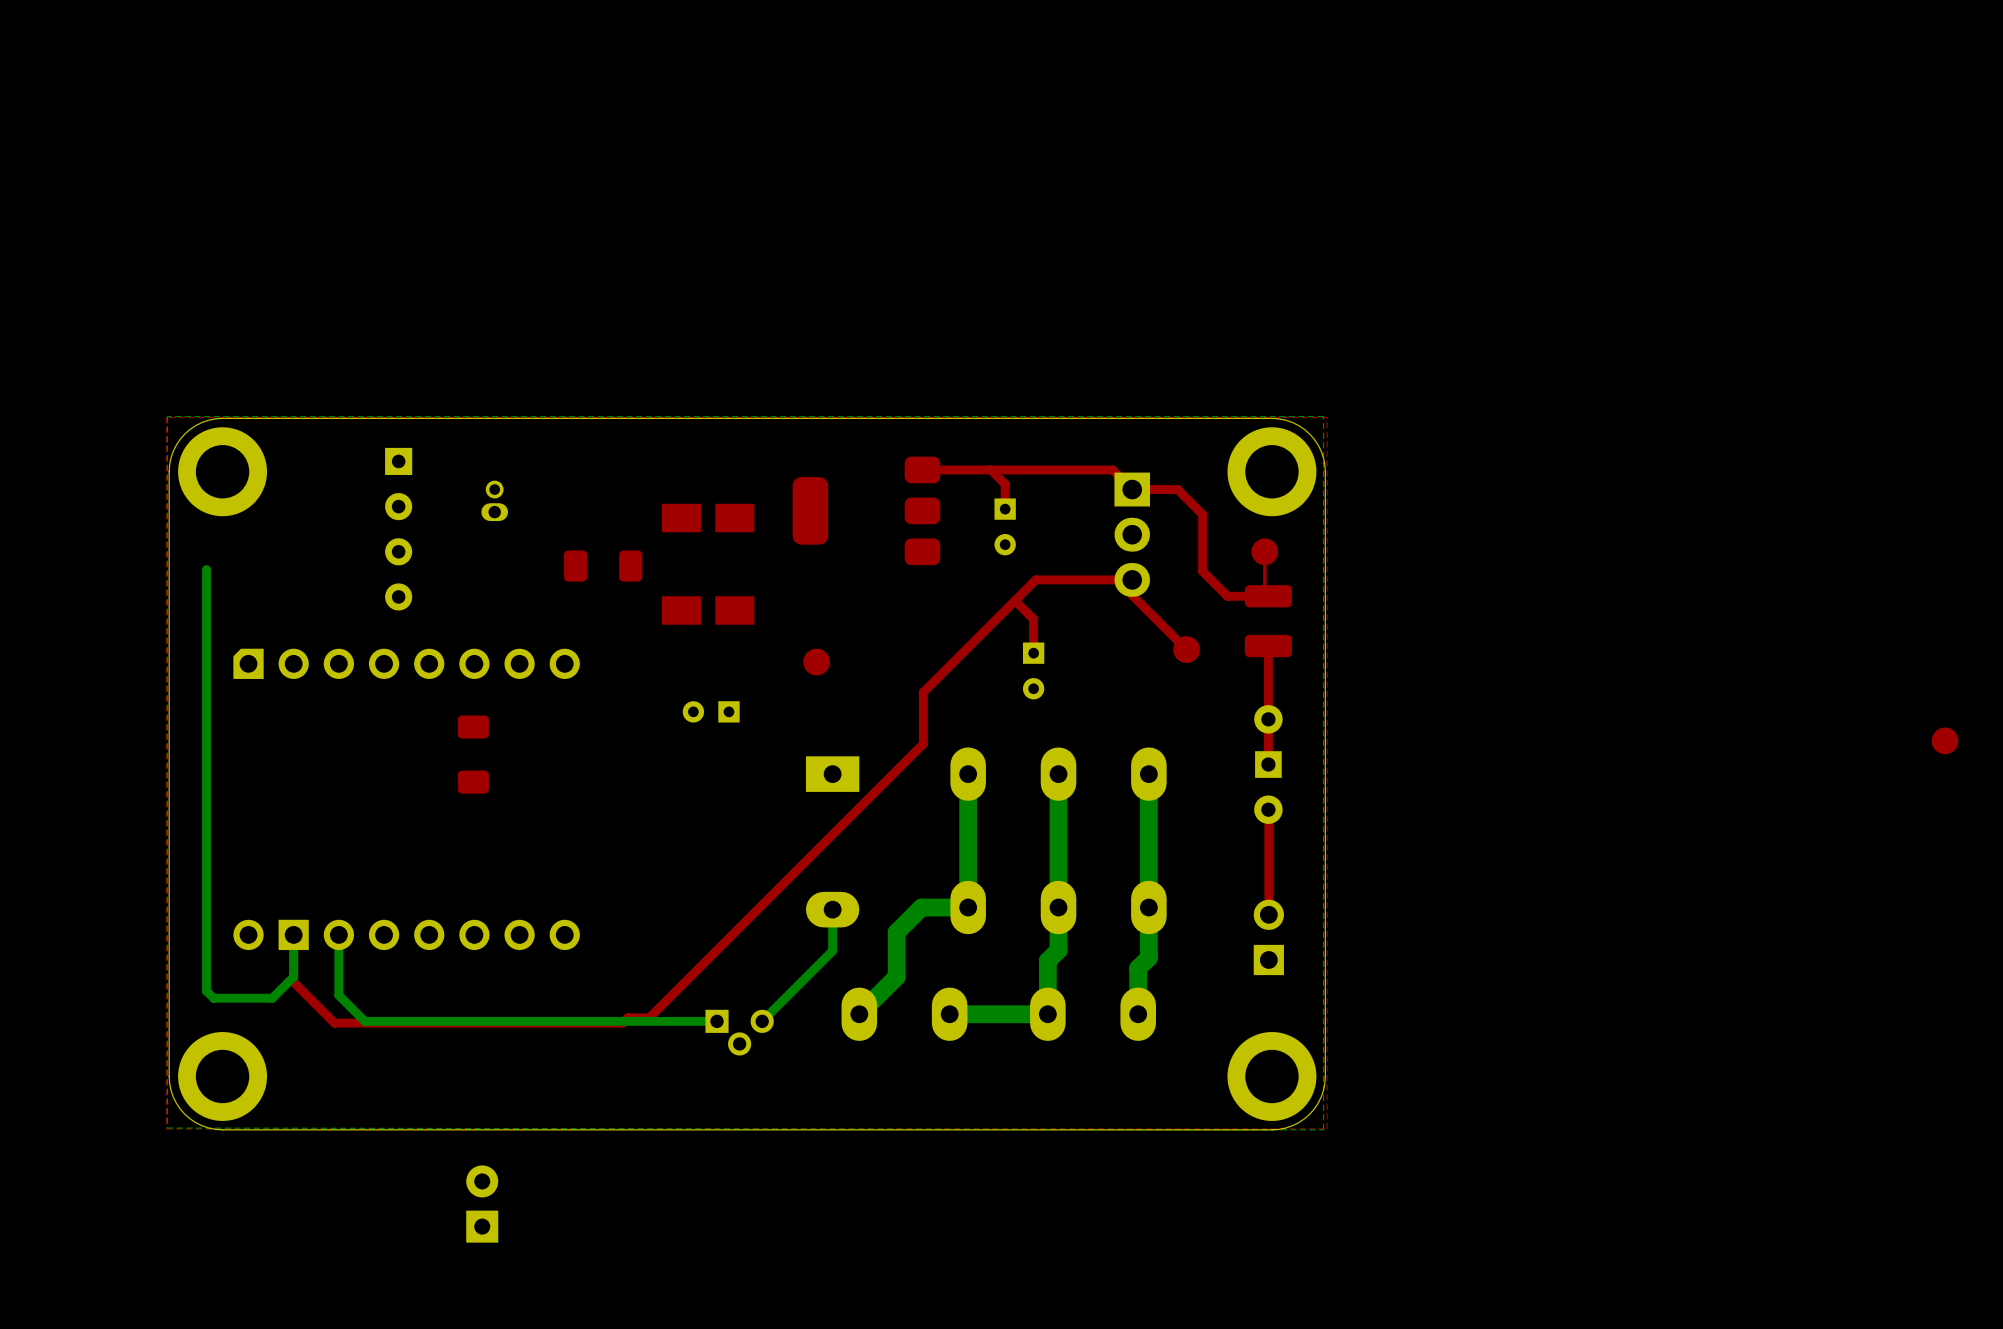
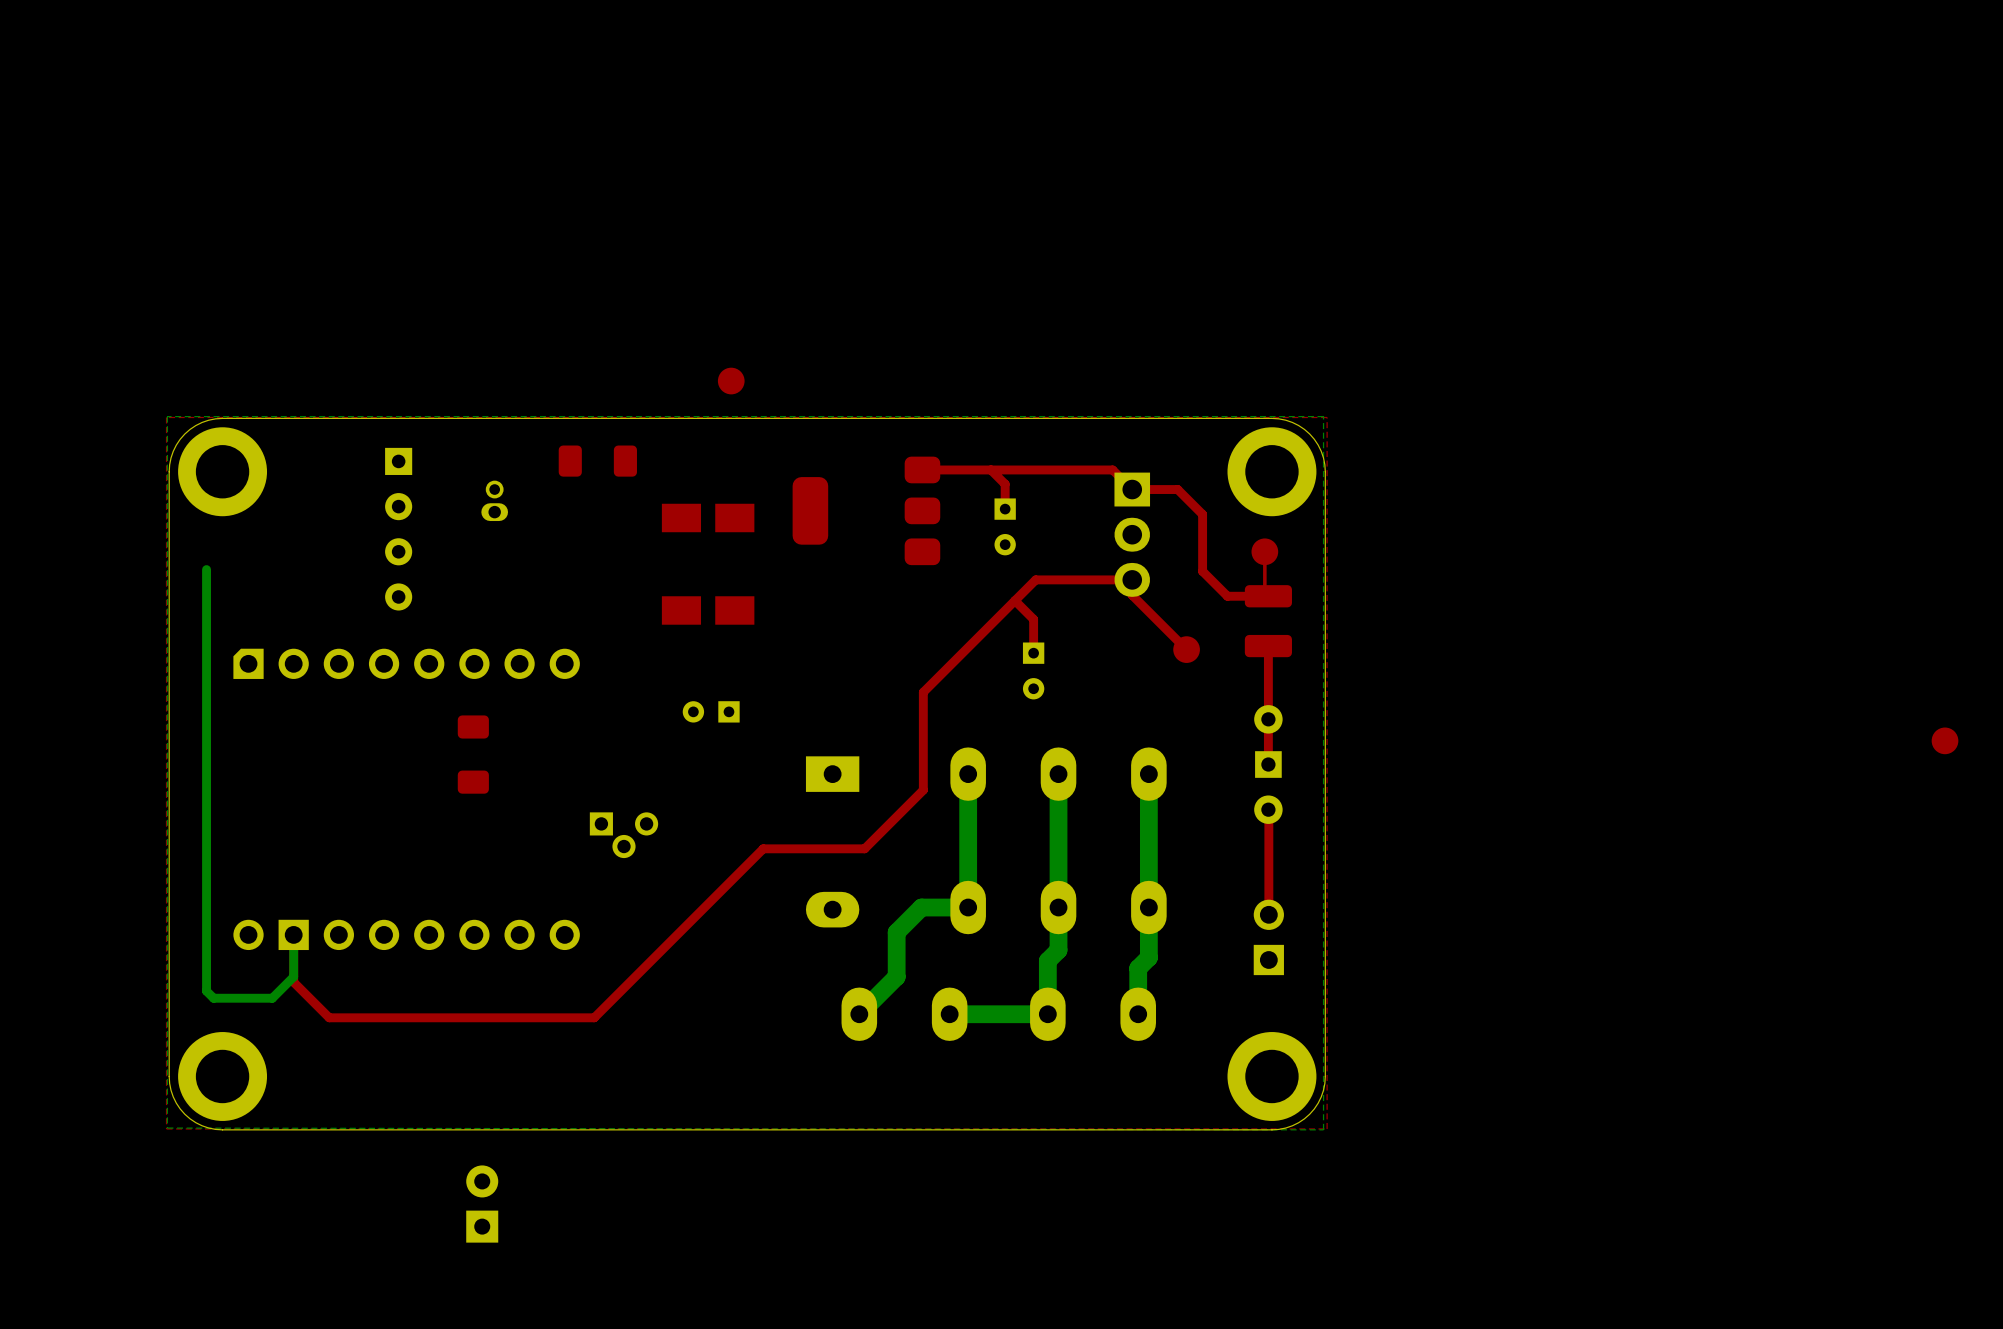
part position: (603, 566) -> (597, 461)
part position: (816, 662) -> (731, 381)
top track: (923, 743) (649, 1017) (628, 1017) (622, 1023) (334, 1023) (329, 1017) -> (923, 743) (923, 790) (864, 848) (763, 848) (594, 1017) (329, 1017)
bottom track: (832, 909) (832, 950) (762, 1021) -> none
bottom track: (338, 934) (338, 995) (364, 1021) (717, 1021) -> none
part position: (739, 1032) -> (623, 835)

